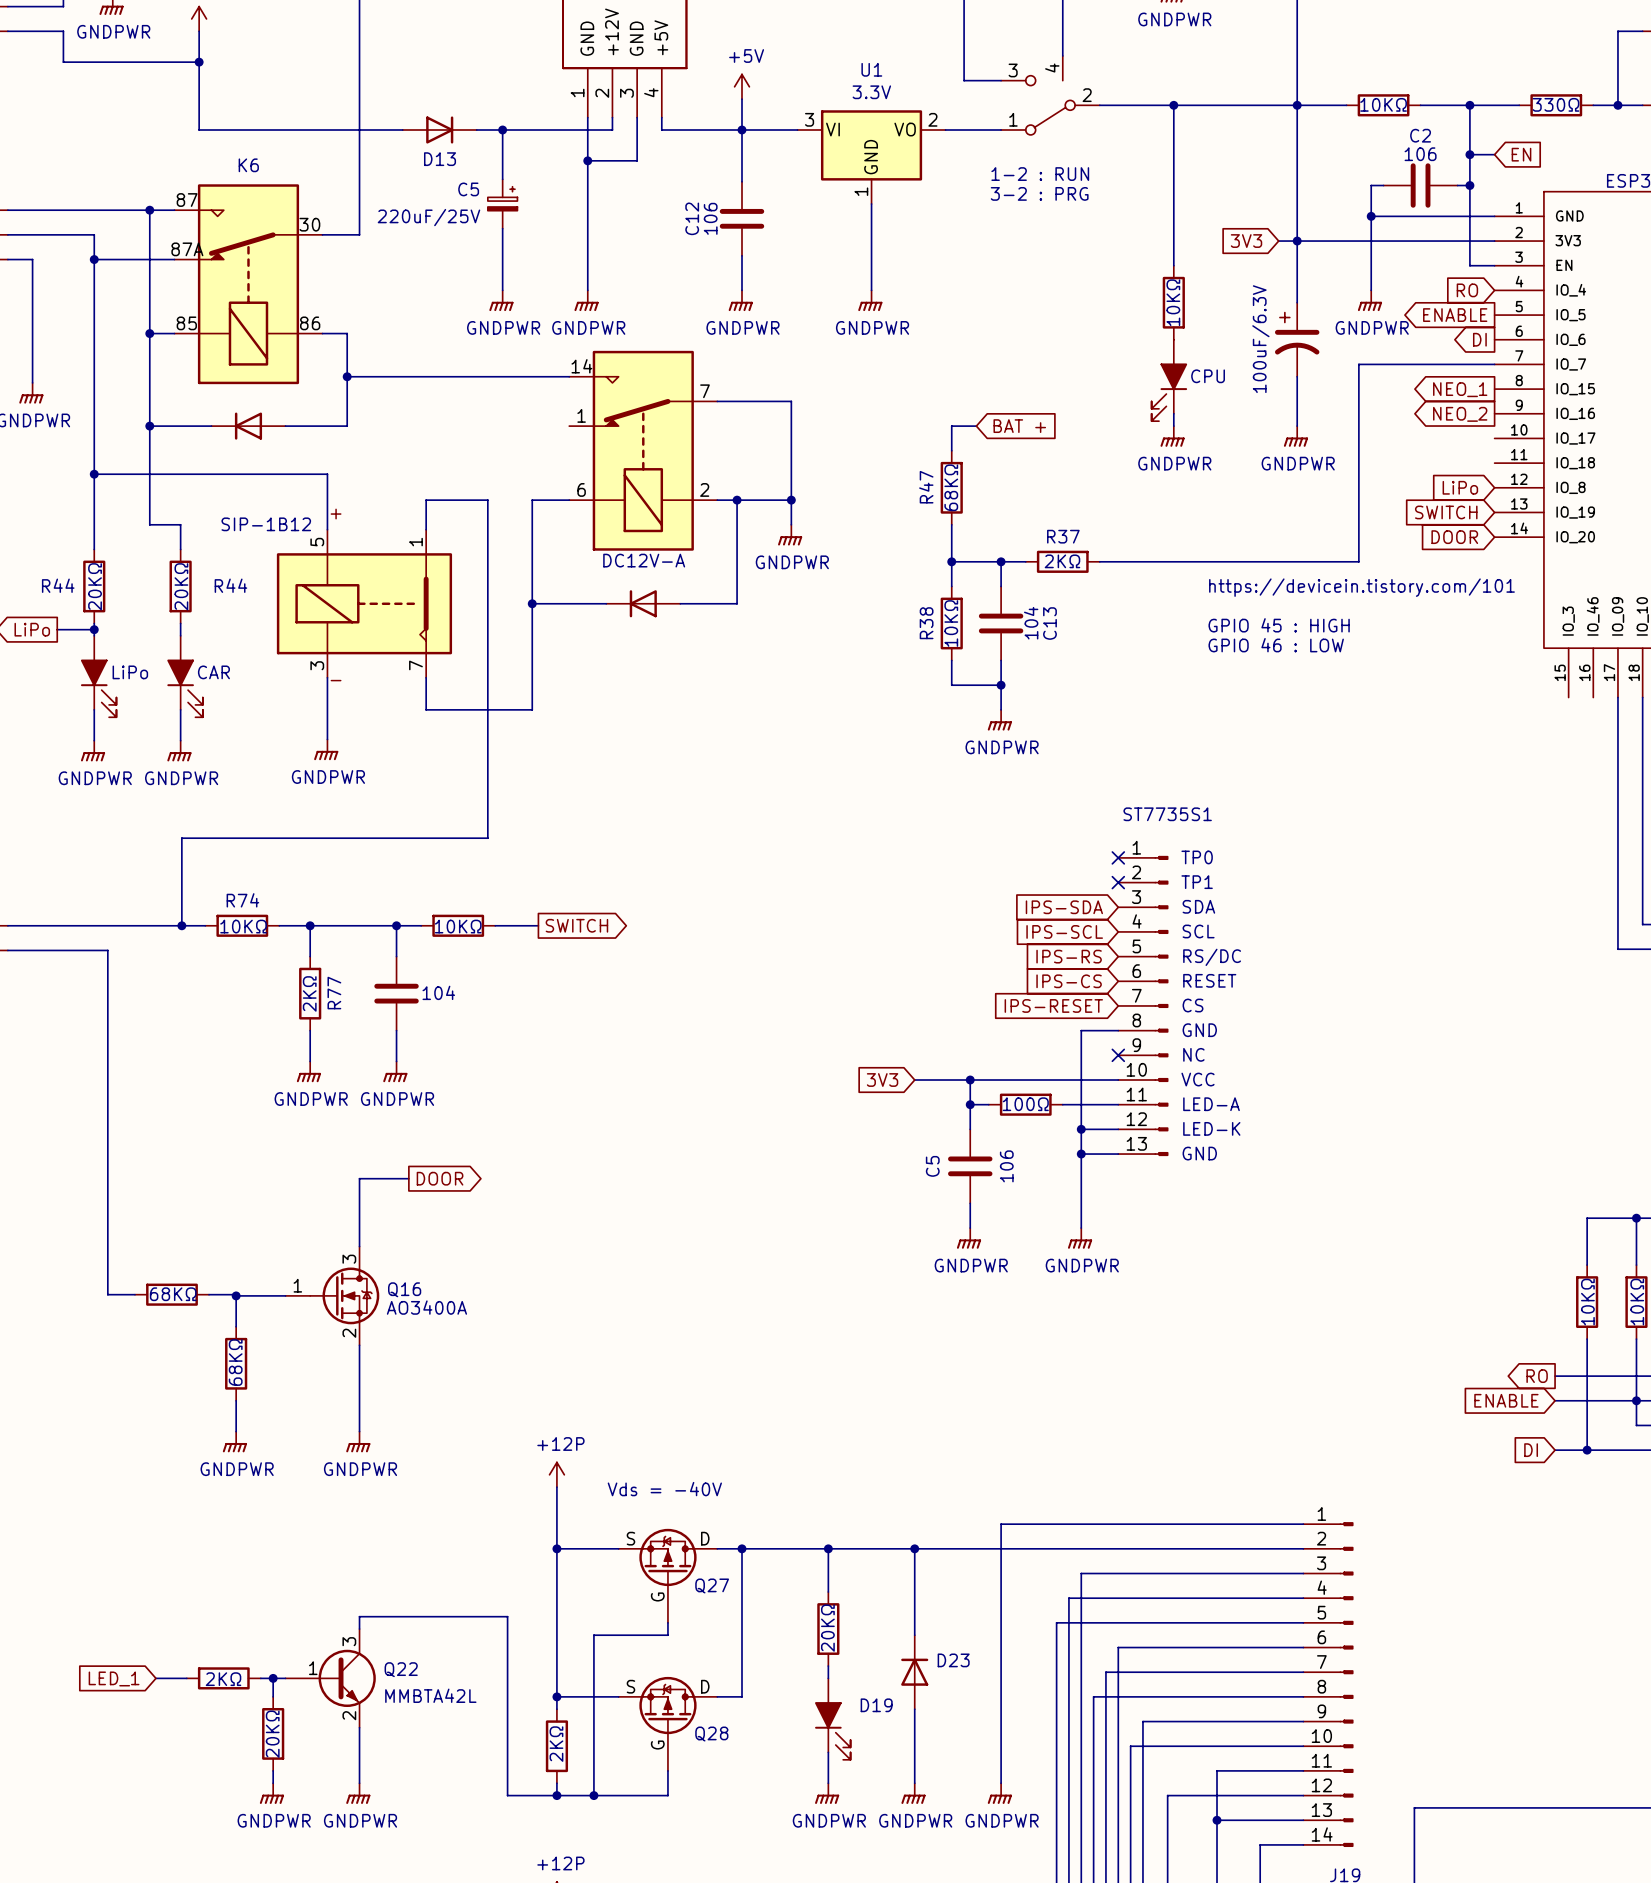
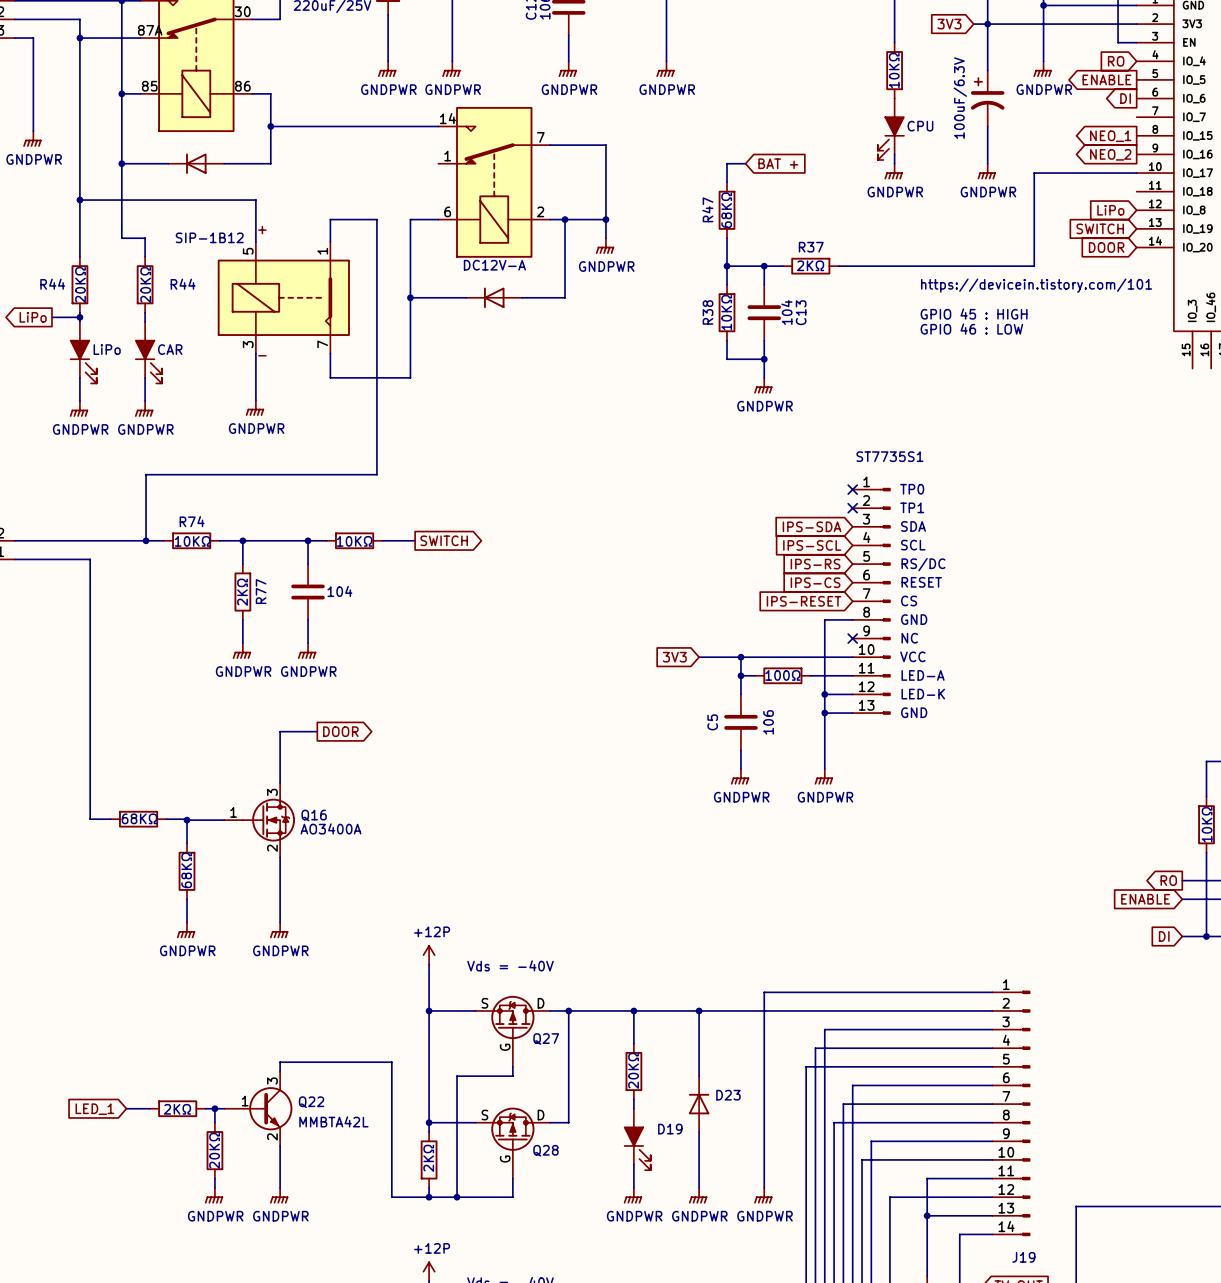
wire: (1494, 364) (1358, 364) (1358, 438) -> (1136, 173) (1034, 173)

